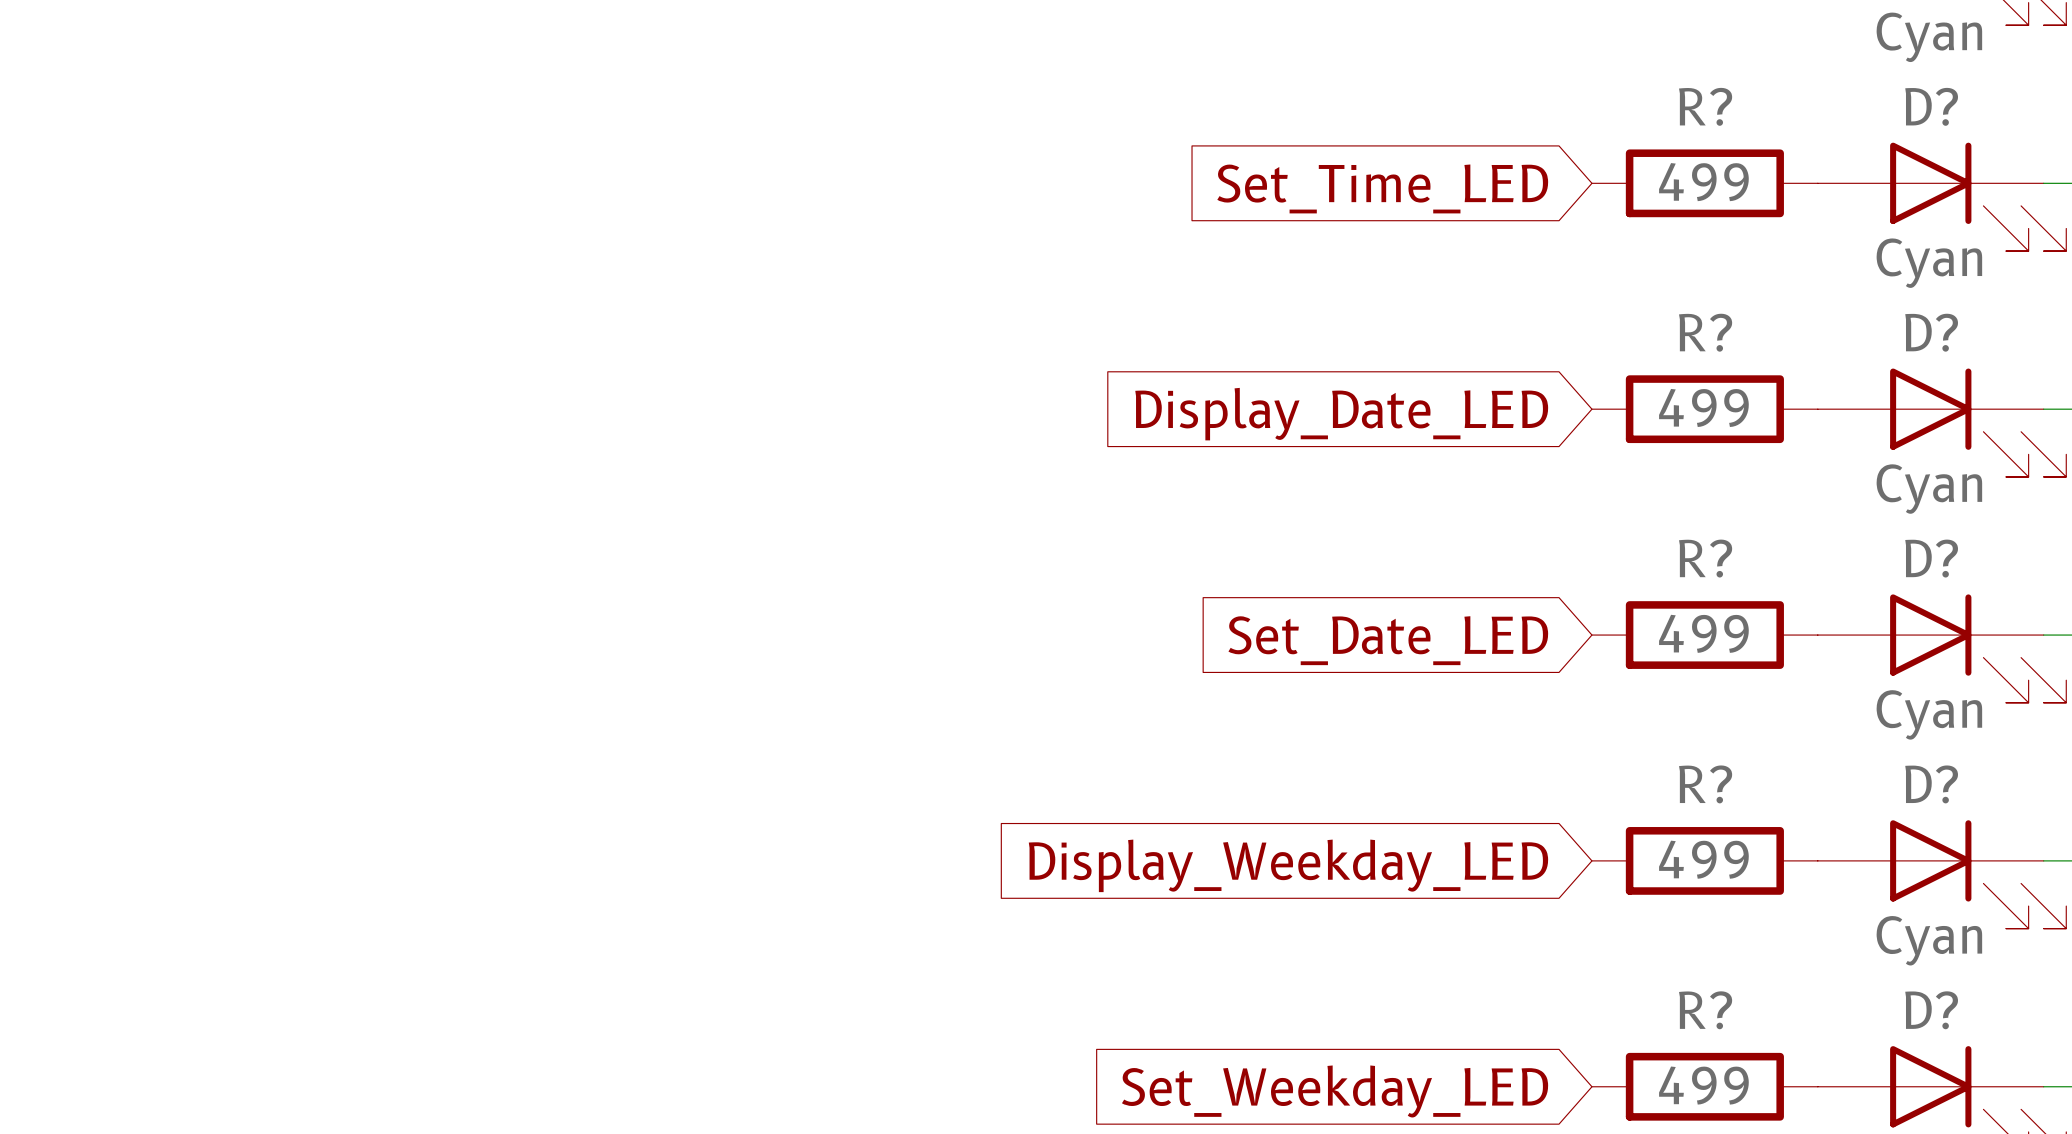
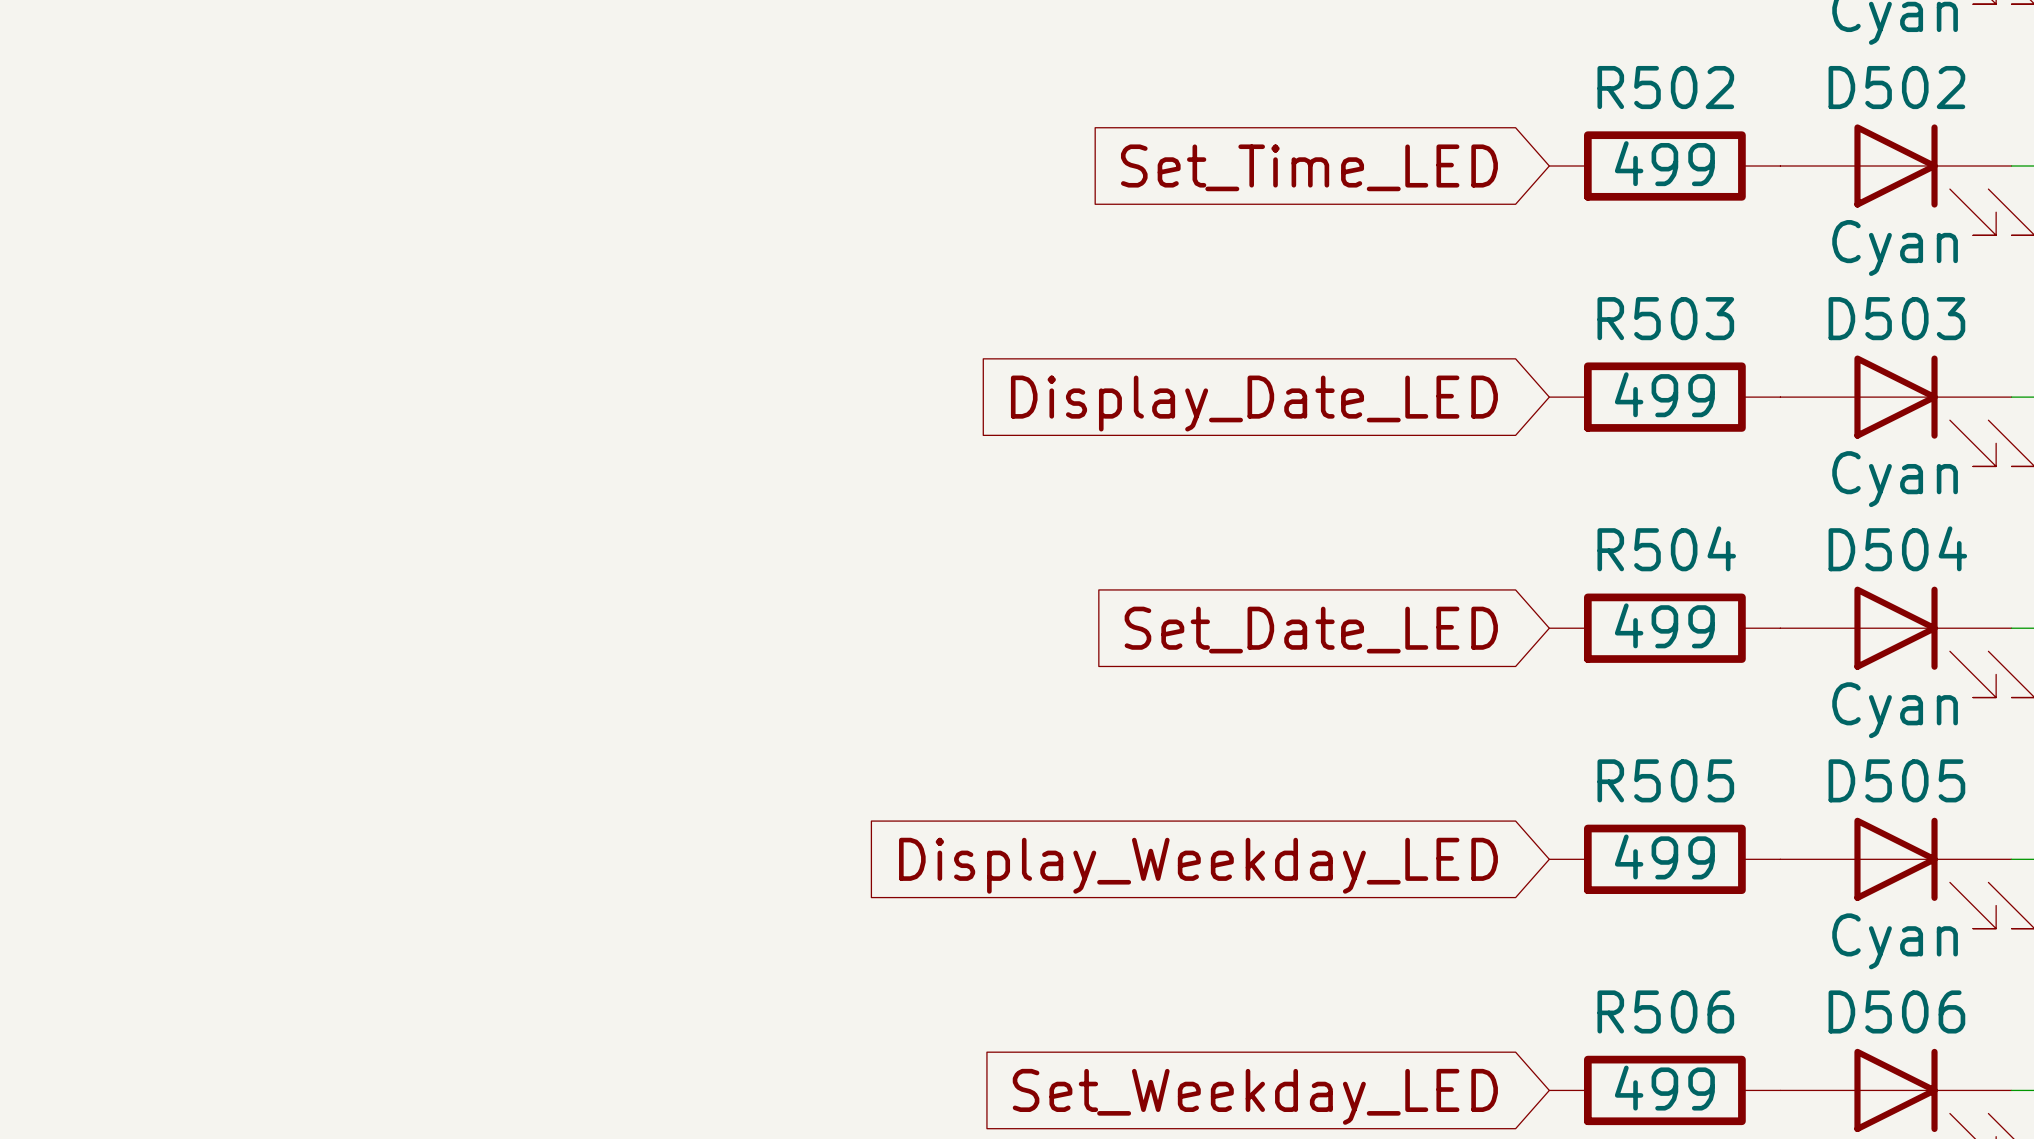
R? name: R? (1705, 106) -> R502 (1665, 87)
D? name: D? (1931, 106) -> D502 (1896, 87)
R? name: R? (1705, 332) -> R503 (1665, 318)
D? name: D? (1931, 332) -> D503 (1896, 318)
R? name: R? (1705, 558) -> R504 (1666, 548)
D? name: D? (1931, 558) -> D504 (1897, 548)
R? name: R? (1705, 784) -> R505 (1665, 780)
D? name: D? (1931, 784) -> D505 (1896, 780)
R? name: R? (1705, 1010) -> R506 (1665, 1011)
D? name: D? (1931, 1010) -> D506 (1896, 1011)

